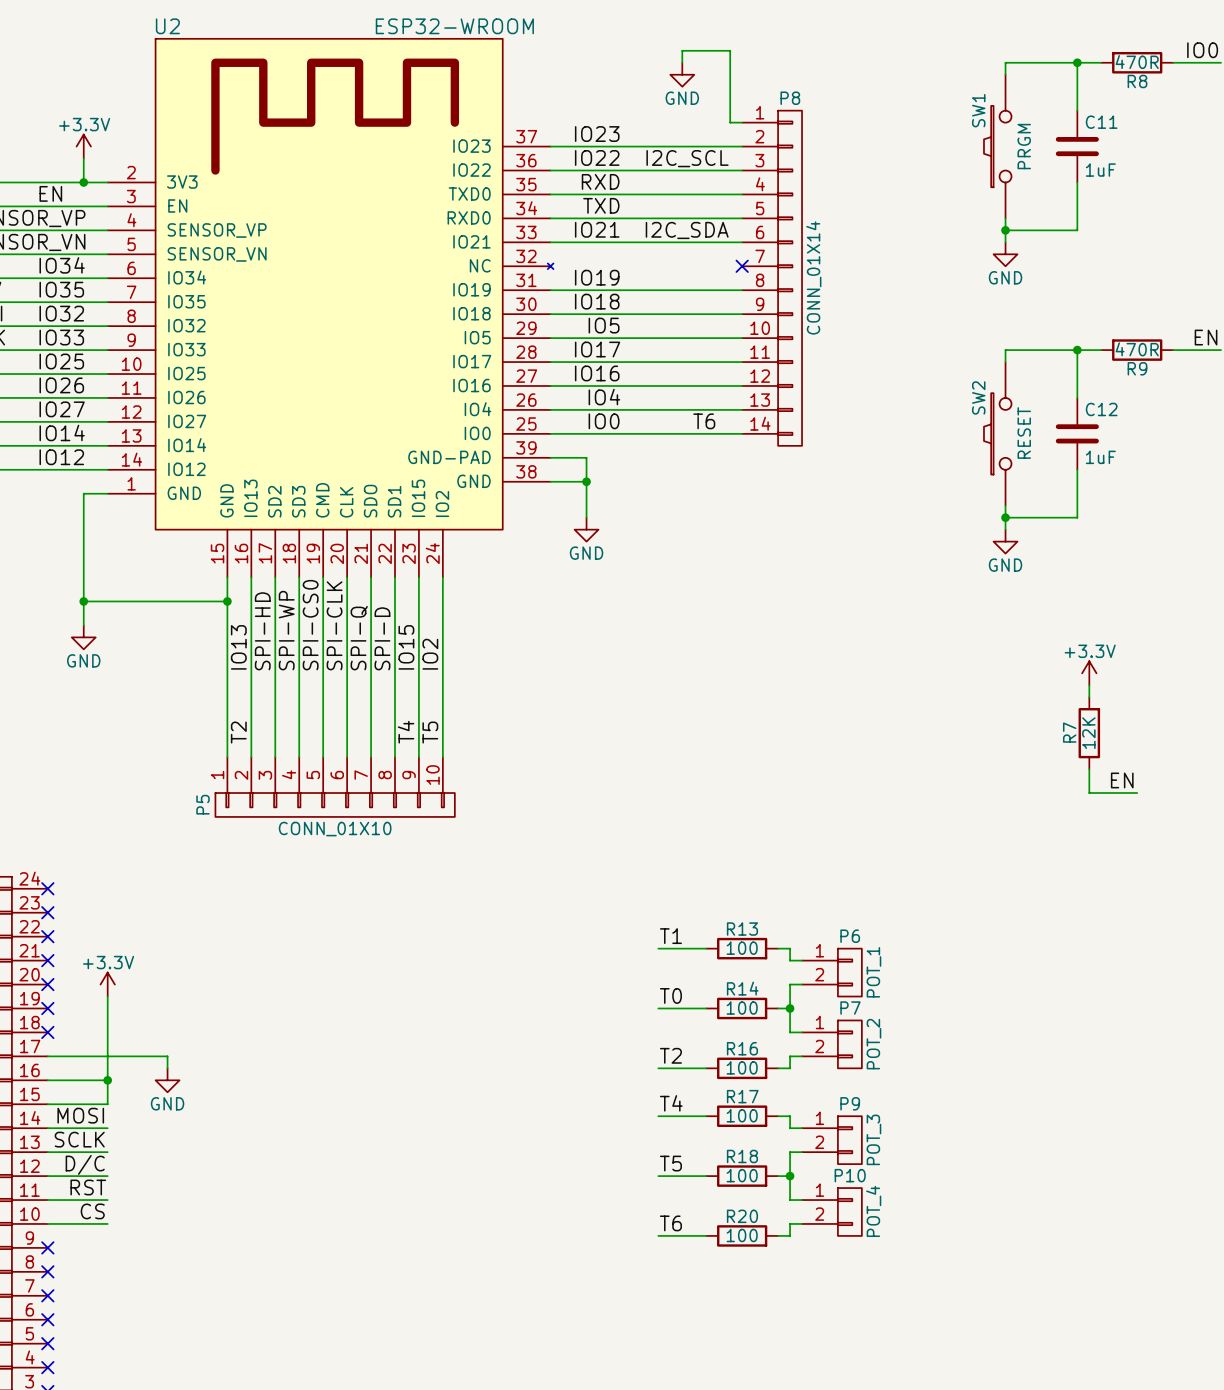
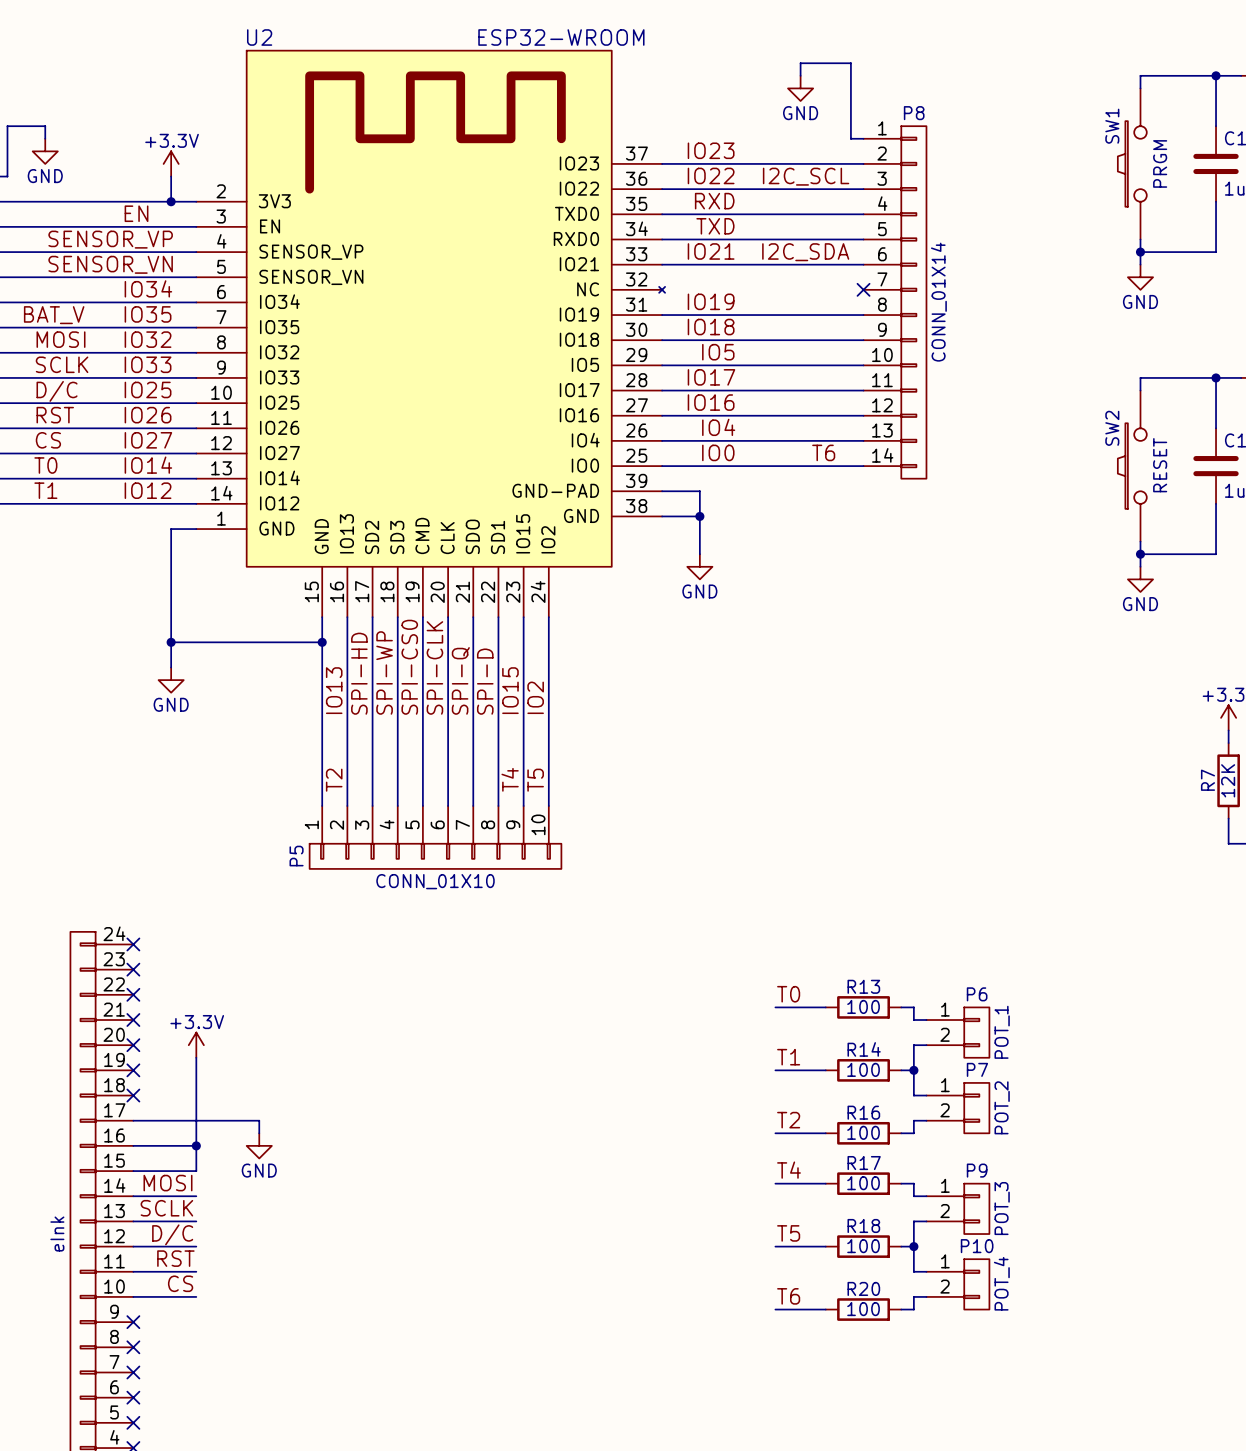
label: T1 (670, 936) -> T0 (788, 994)
label: T0 (670, 995) -> T1 (788, 1057)

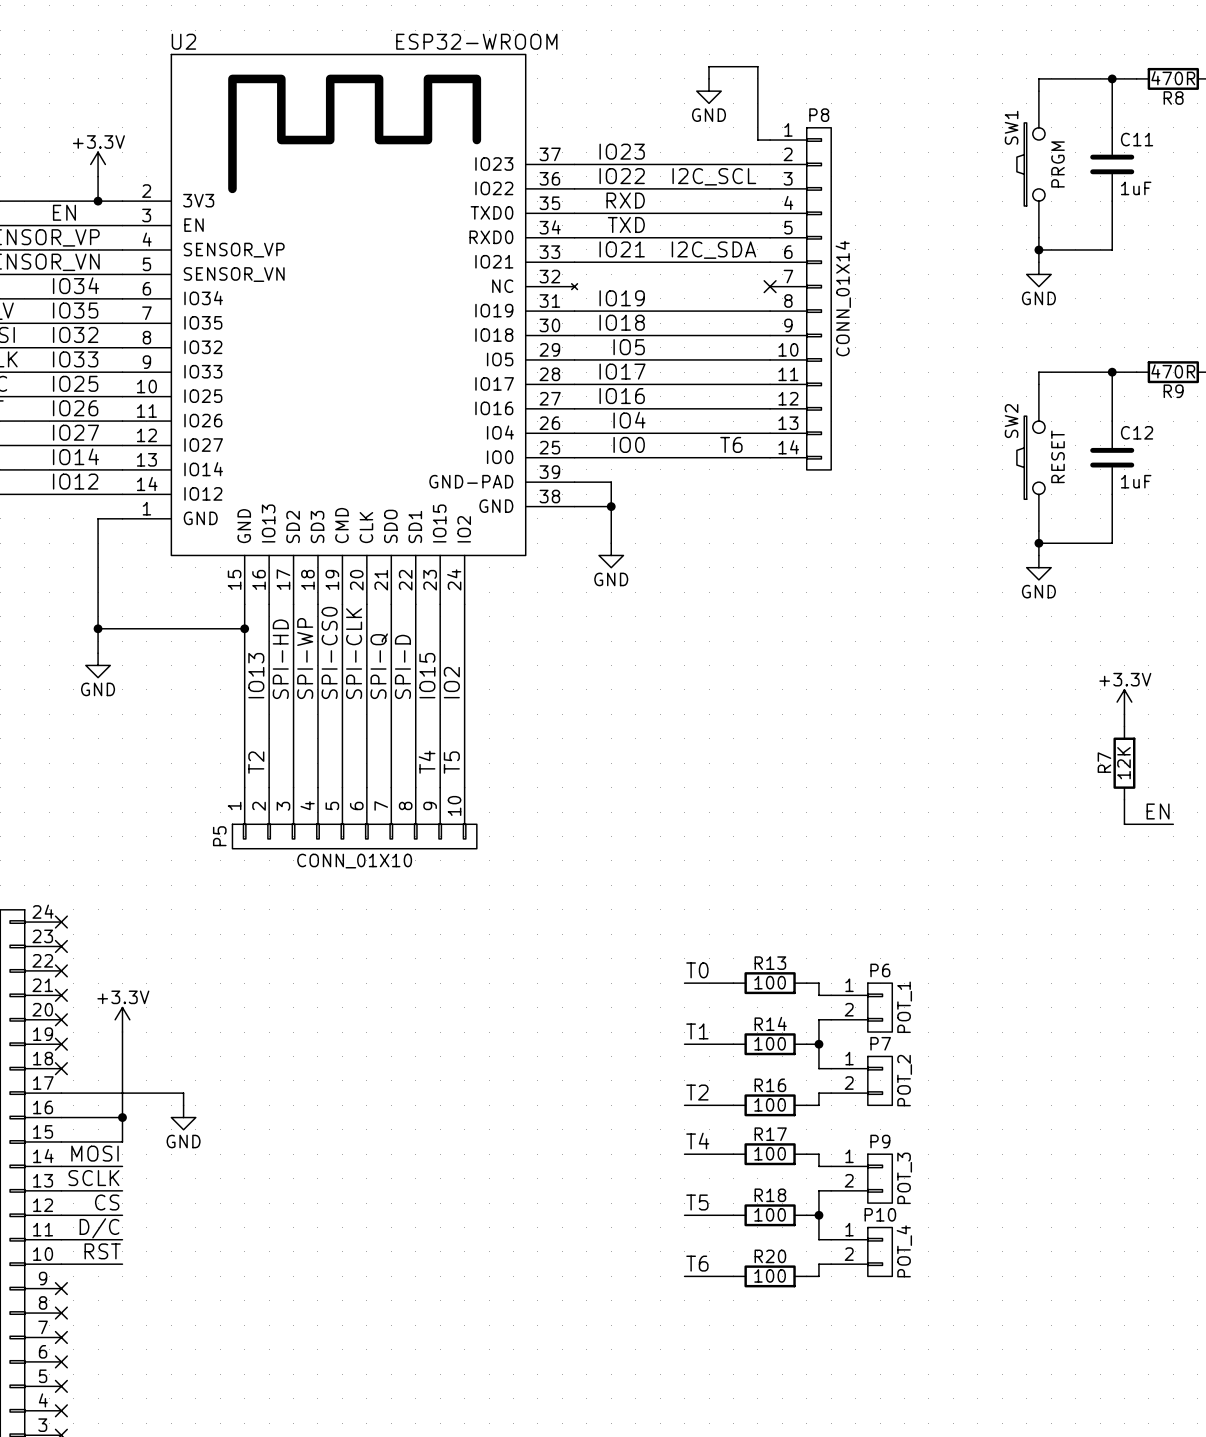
label: D/C (172, 1234) -> CS (107, 1202)
label: RST (175, 1258) -> D/C (99, 1228)
label: CS (180, 1283) -> RST (102, 1251)

